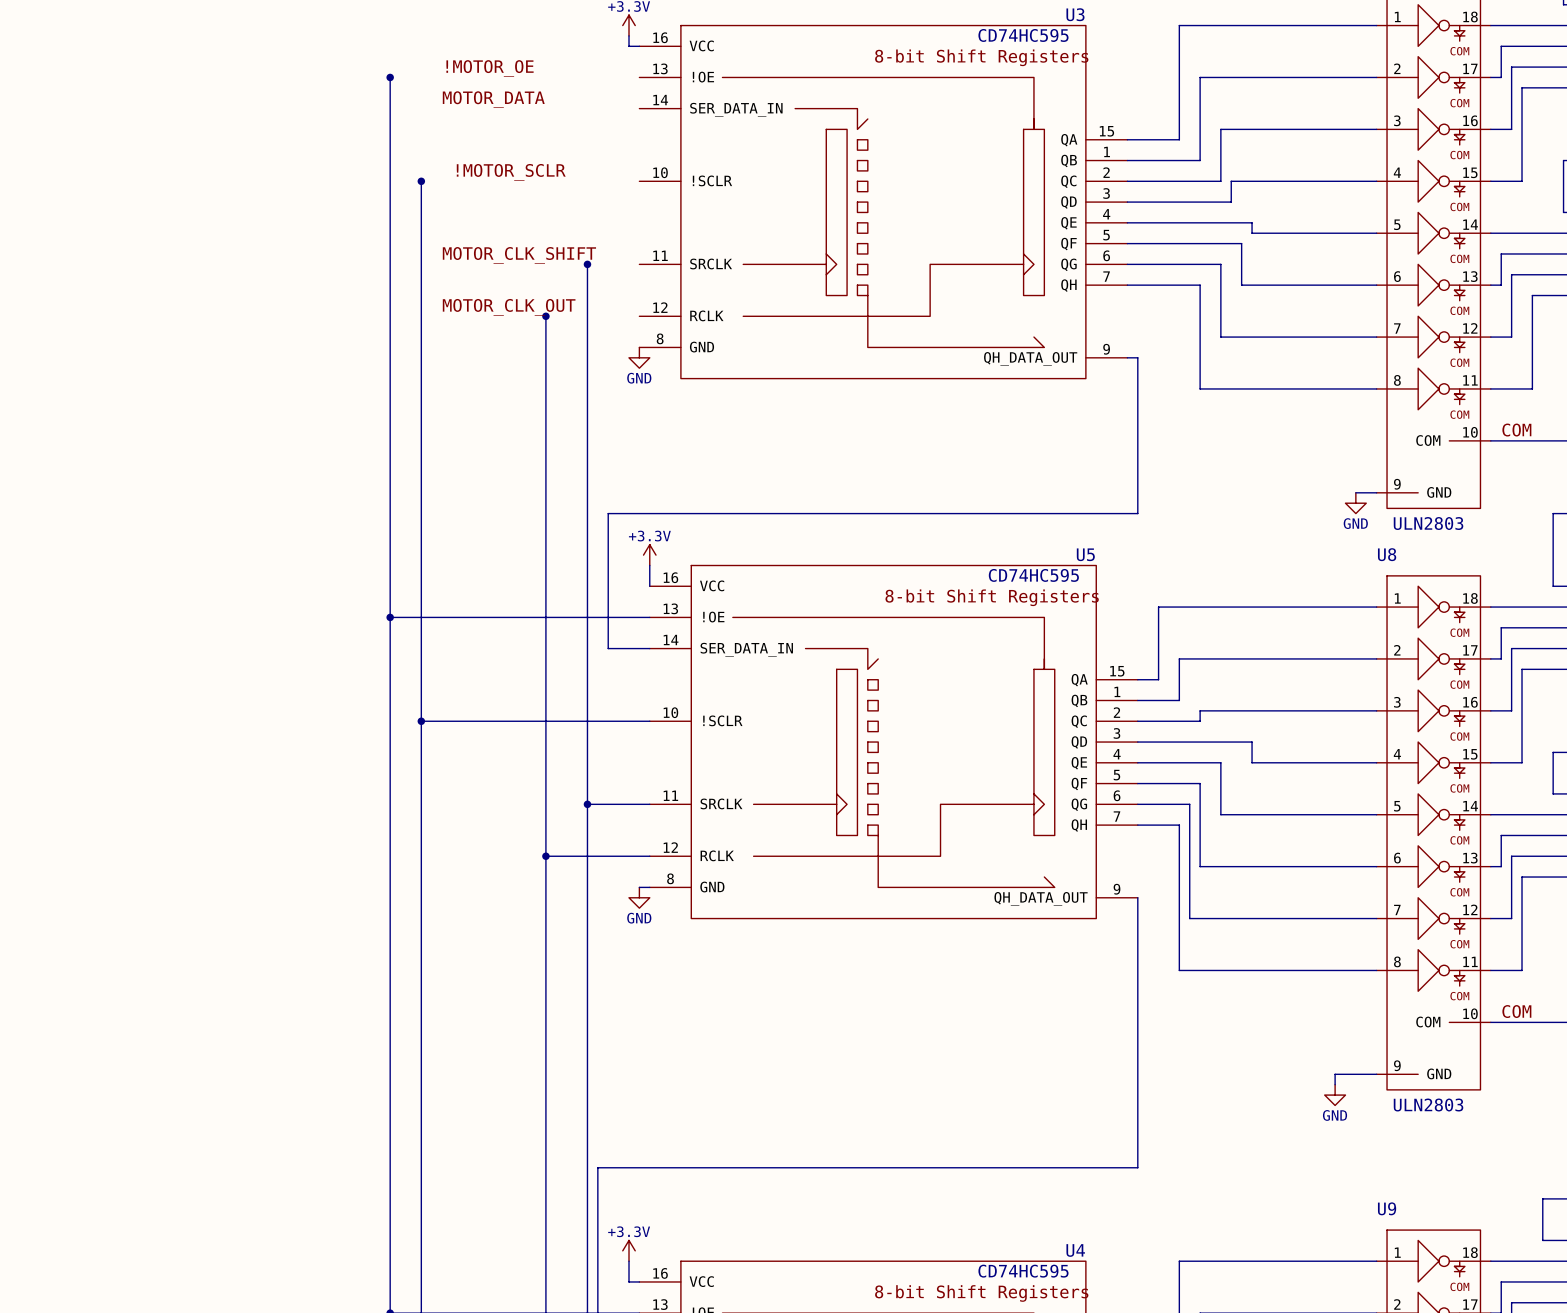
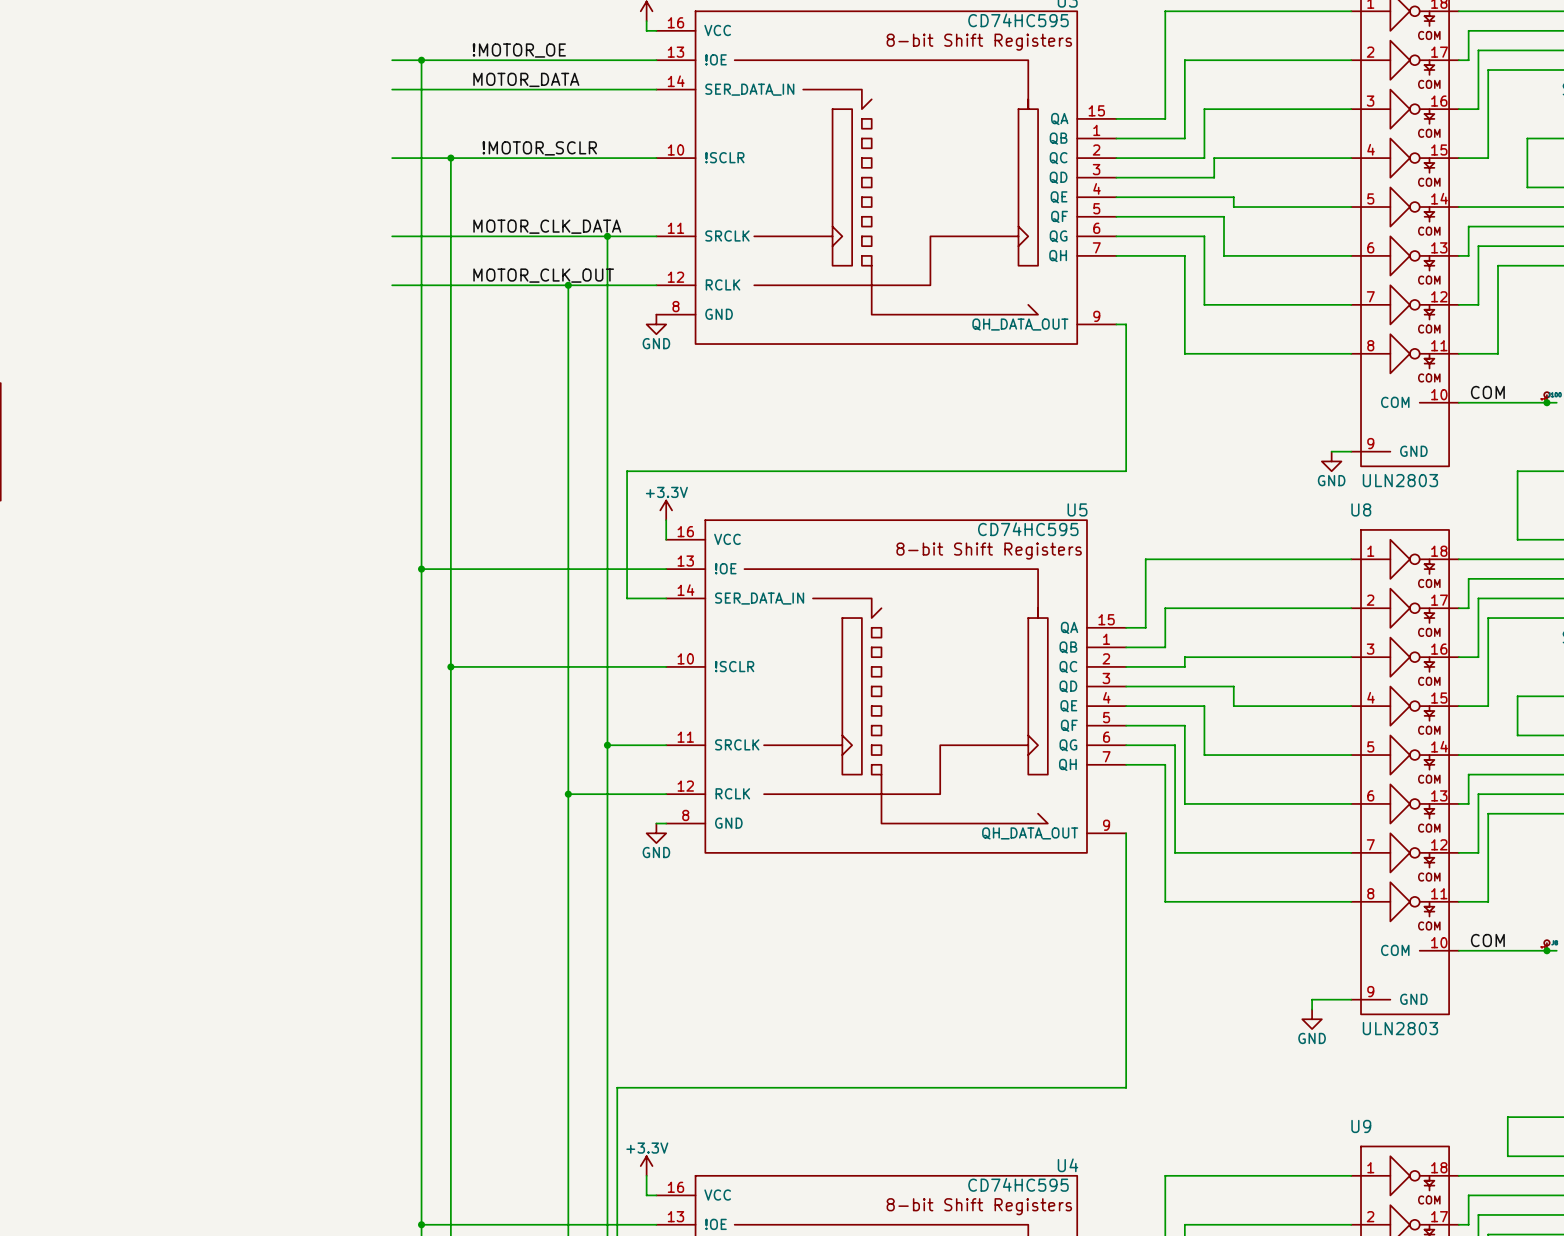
wire: none -> (392, 60) (656, 60)
wire: none -> (392, 89) (656, 89)
wire: none -> (392, 158) (656, 158)
label: MOTOR_CLK_SHIFT (519, 255) -> MOTOR_CLK_DATA (547, 226)
wire: none -> (392, 236) (656, 236)
wire: none -> (392, 285) (656, 285)

